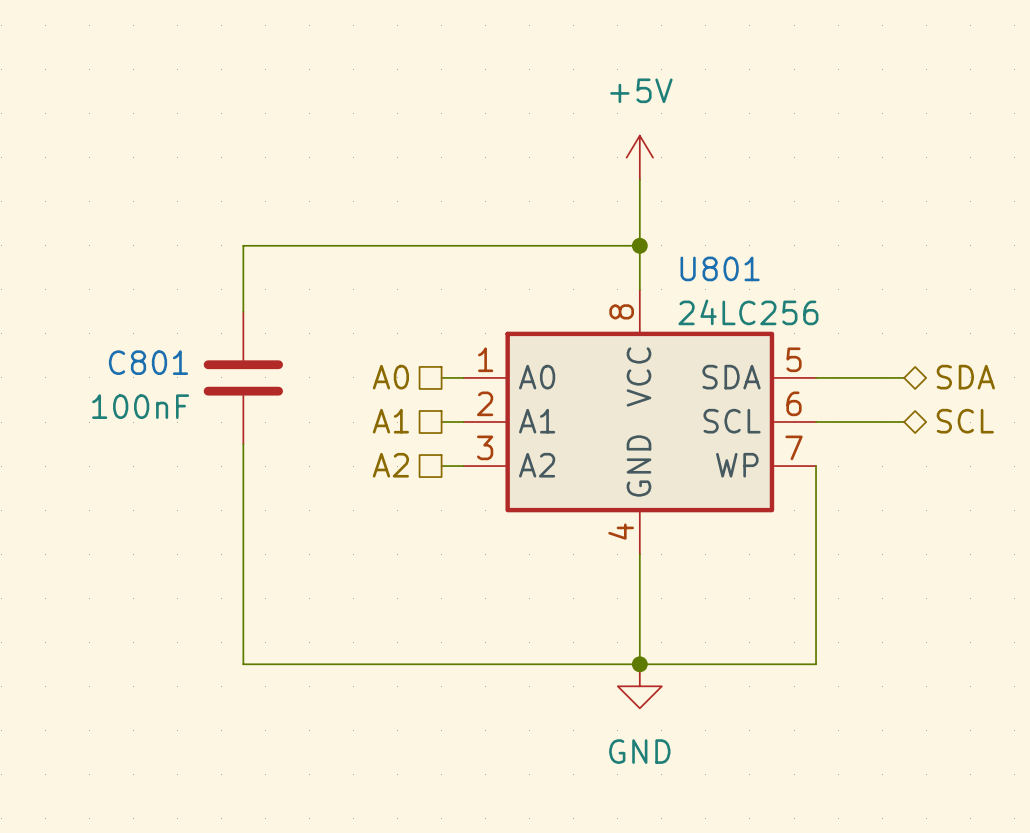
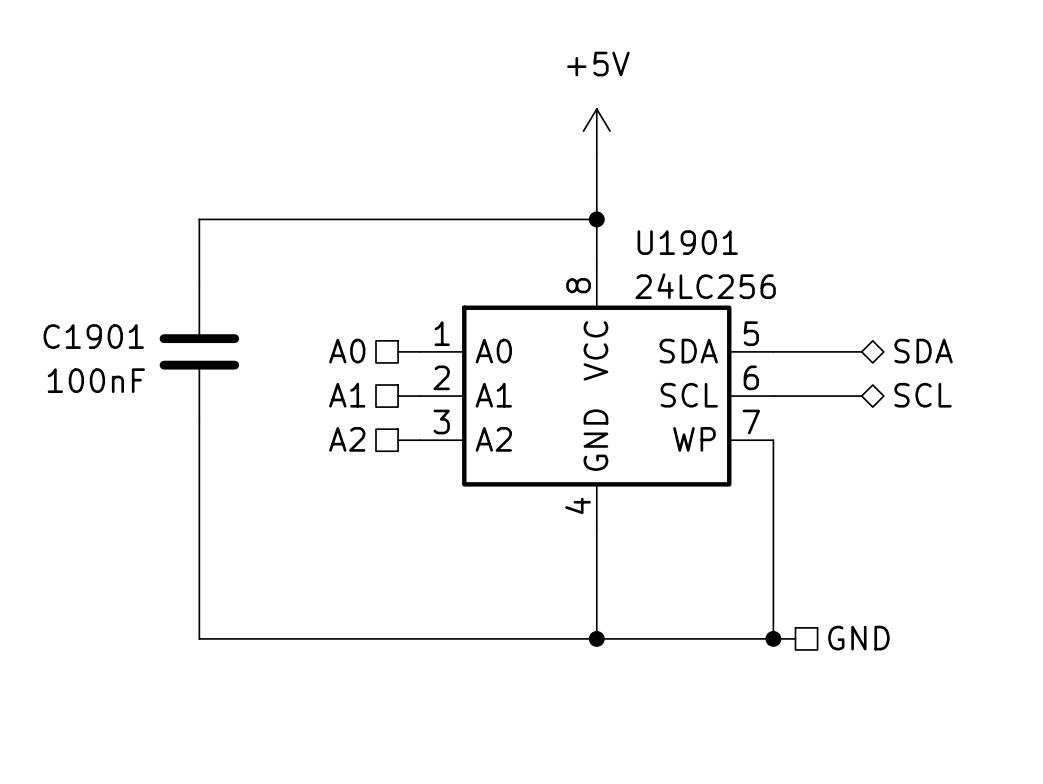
U801 name: U801 (720, 268) -> U1901 (687, 242)
C801 name: C801 (148, 362) -> C1901 (93, 336)
hierarchical label: none -> GND (858, 638)
wire: none -> (773, 638) (795, 638)
junction: none -> (773, 638)
power symbol: GND (639, 686) -> none

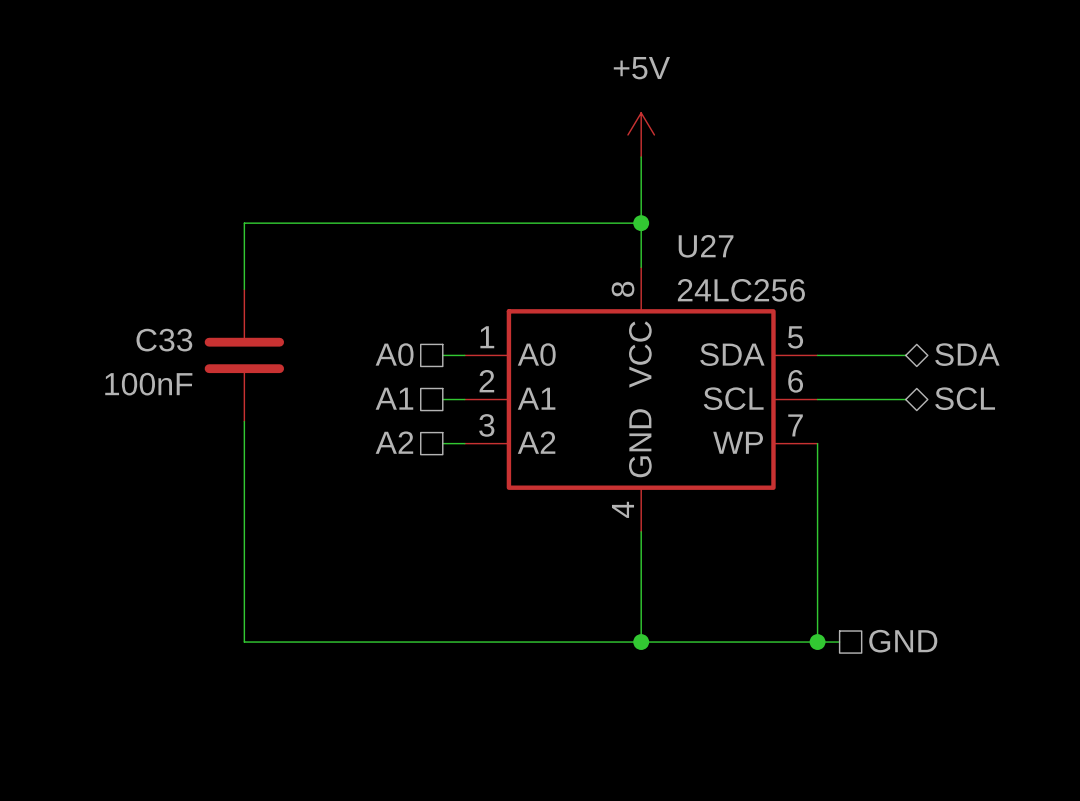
U1901 name: U1901 (687, 242) -> U27 (706, 246)
C1901 name: C1901 (93, 336) -> C33 (164, 340)

